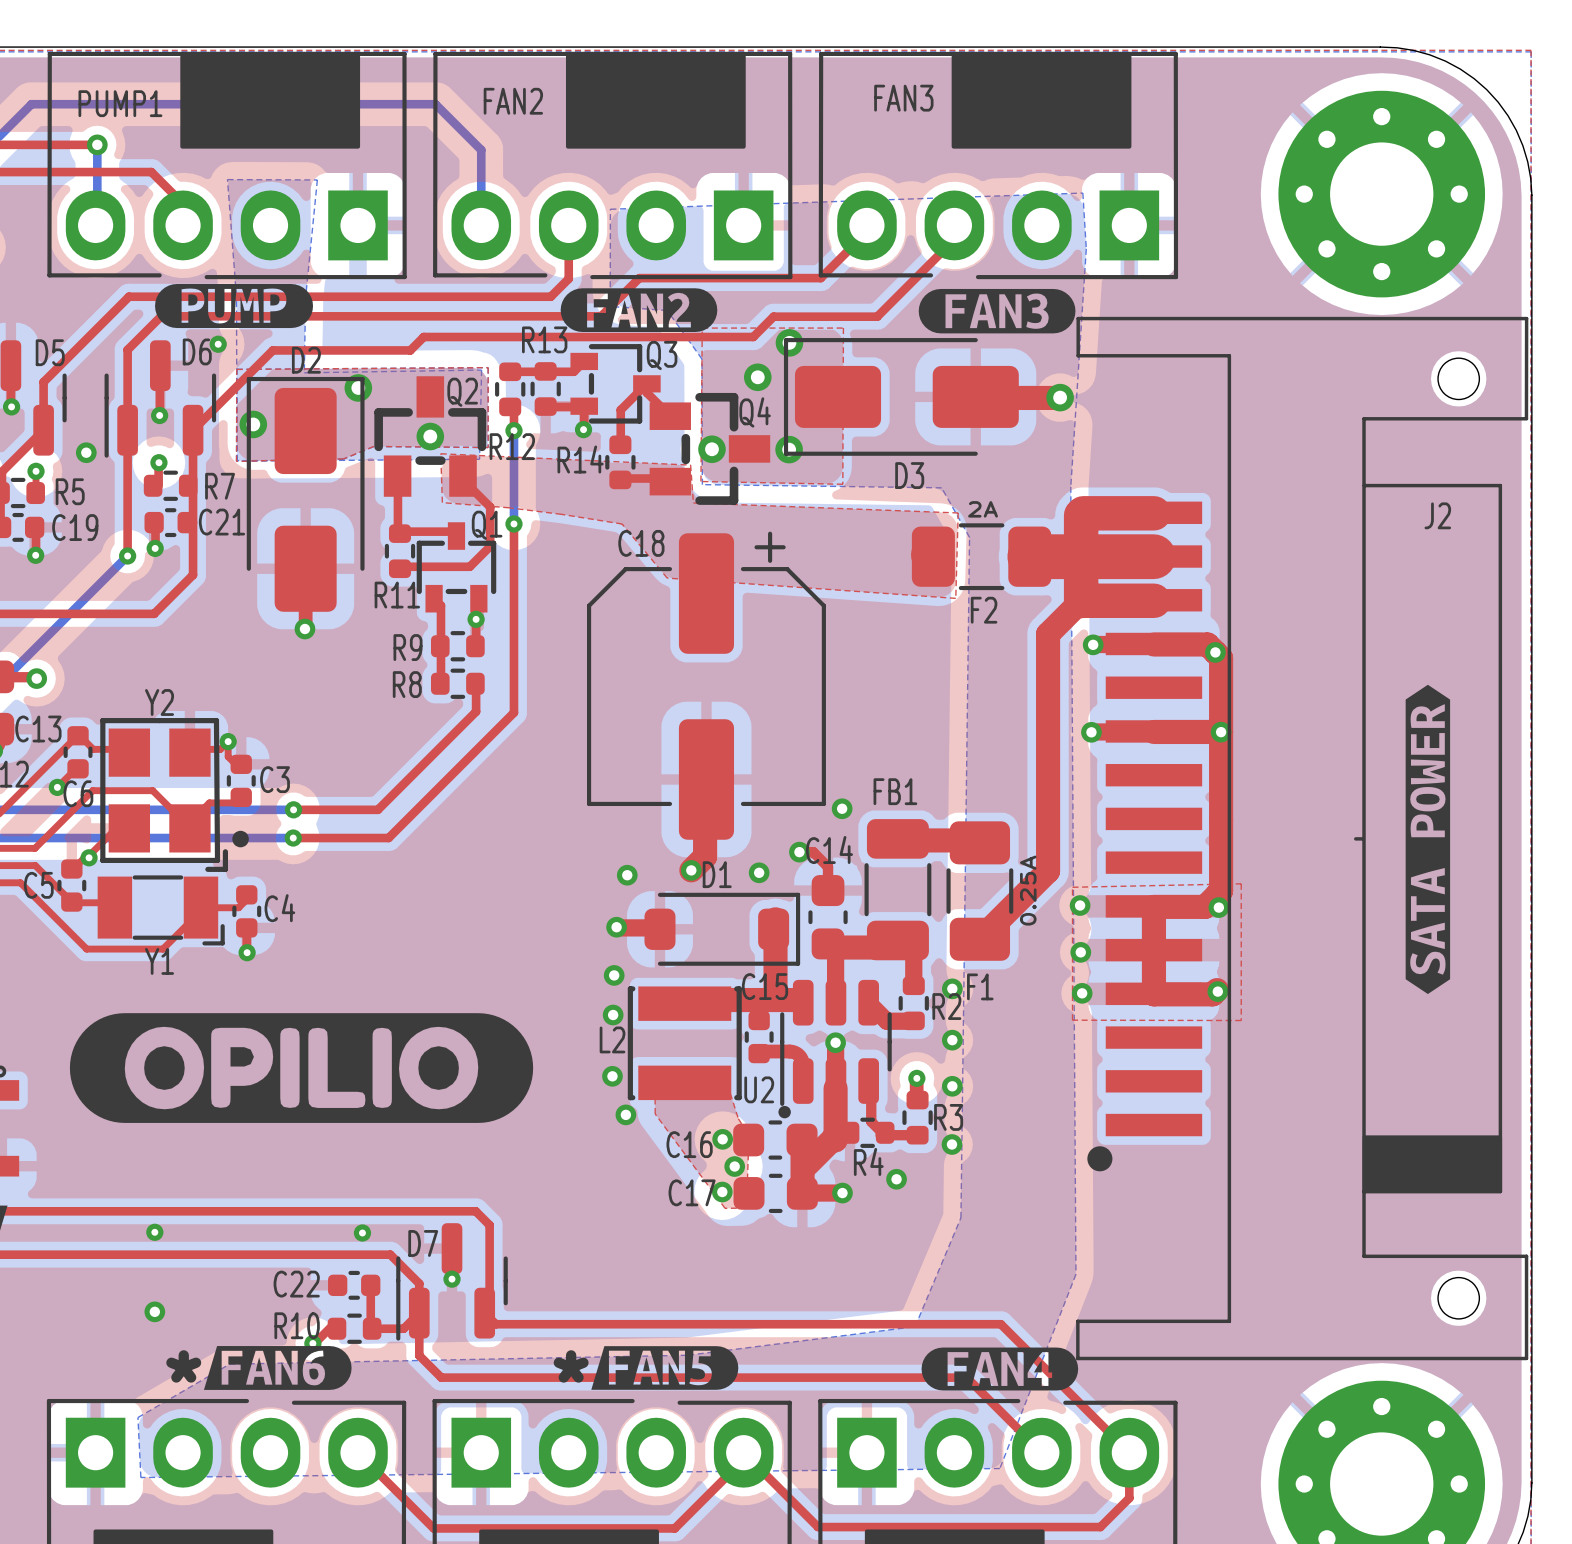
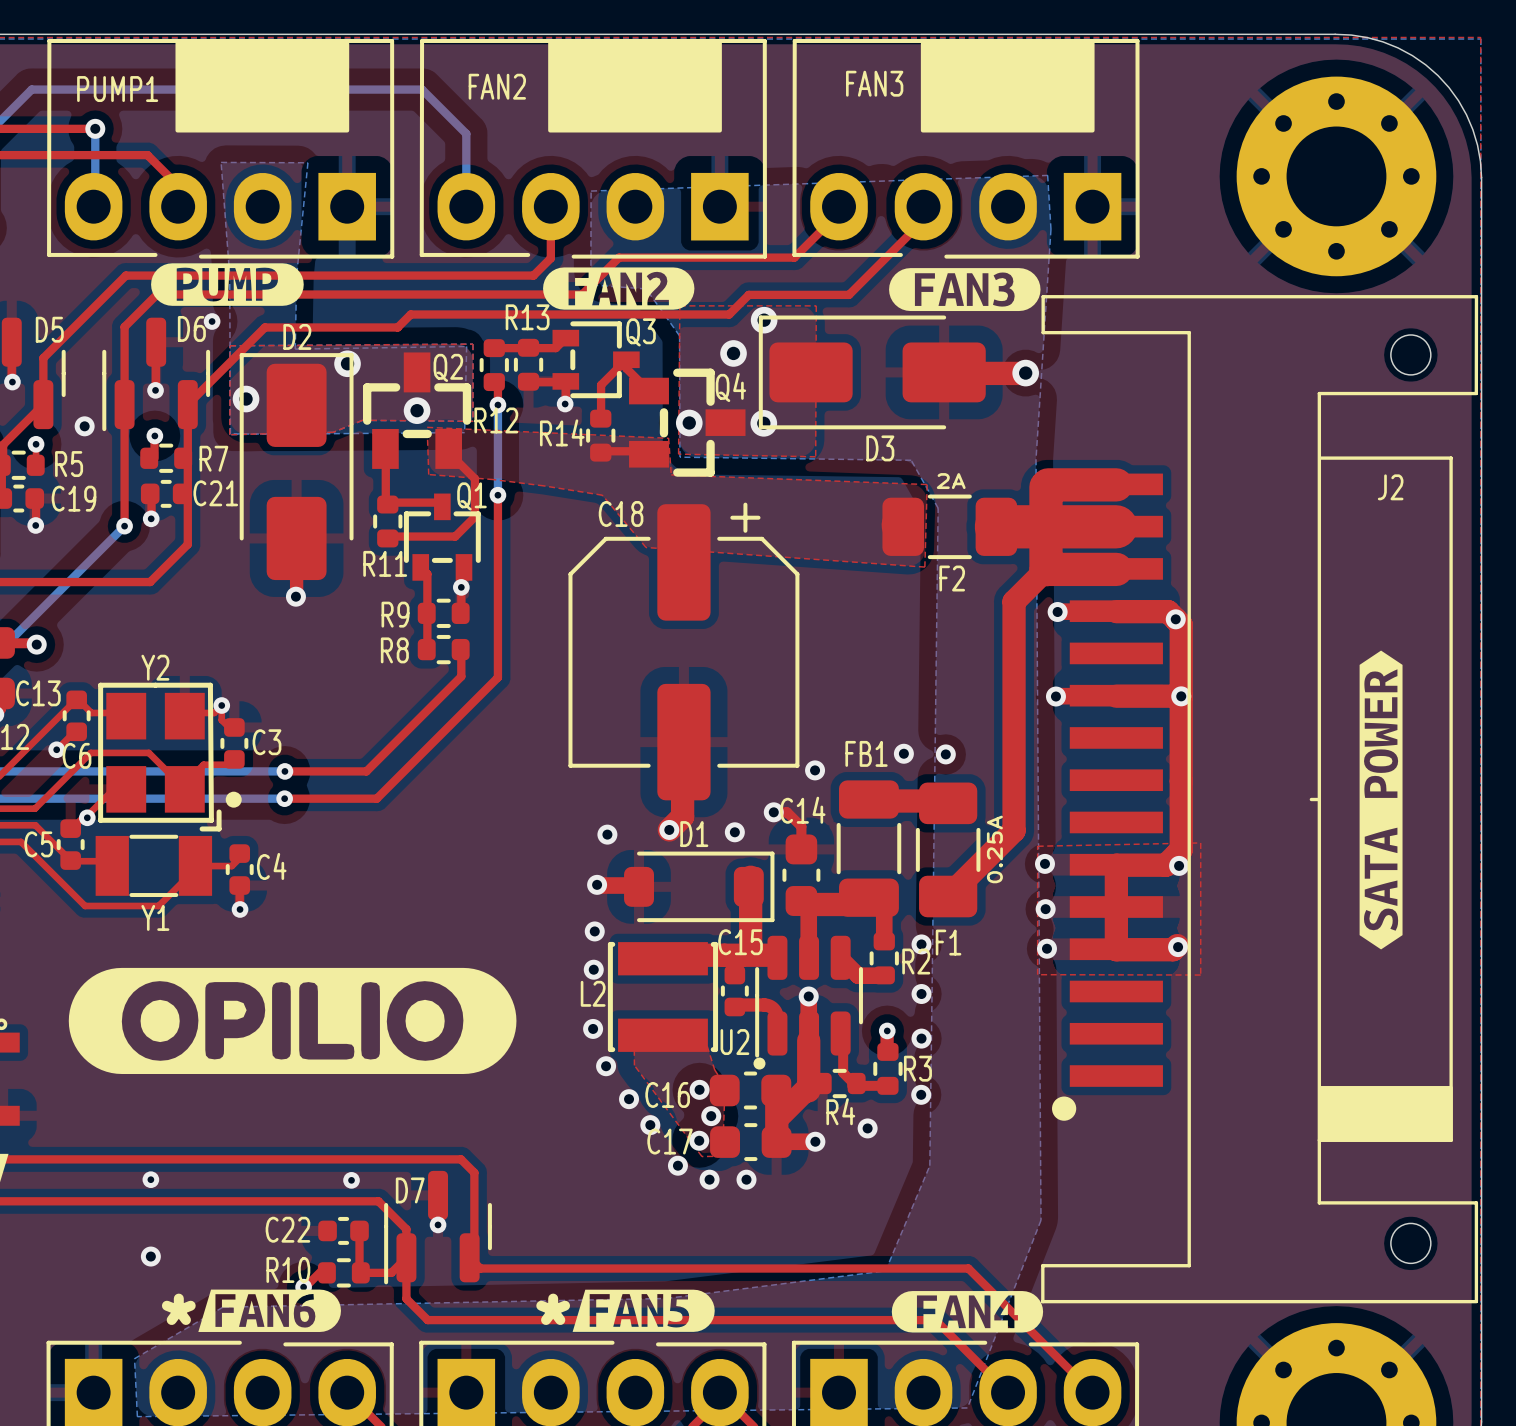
via: none -> (903, 753)
via: none -> (945, 754)
Y1 footprint: [97, 875, 225, 946] -> [95, 834, 213, 898]
via: none -> (629, 1099)
via: none -> (650, 1125)
via: none -> (677, 1165)
via: none -> (709, 1179)
via: none -> (746, 1179)

